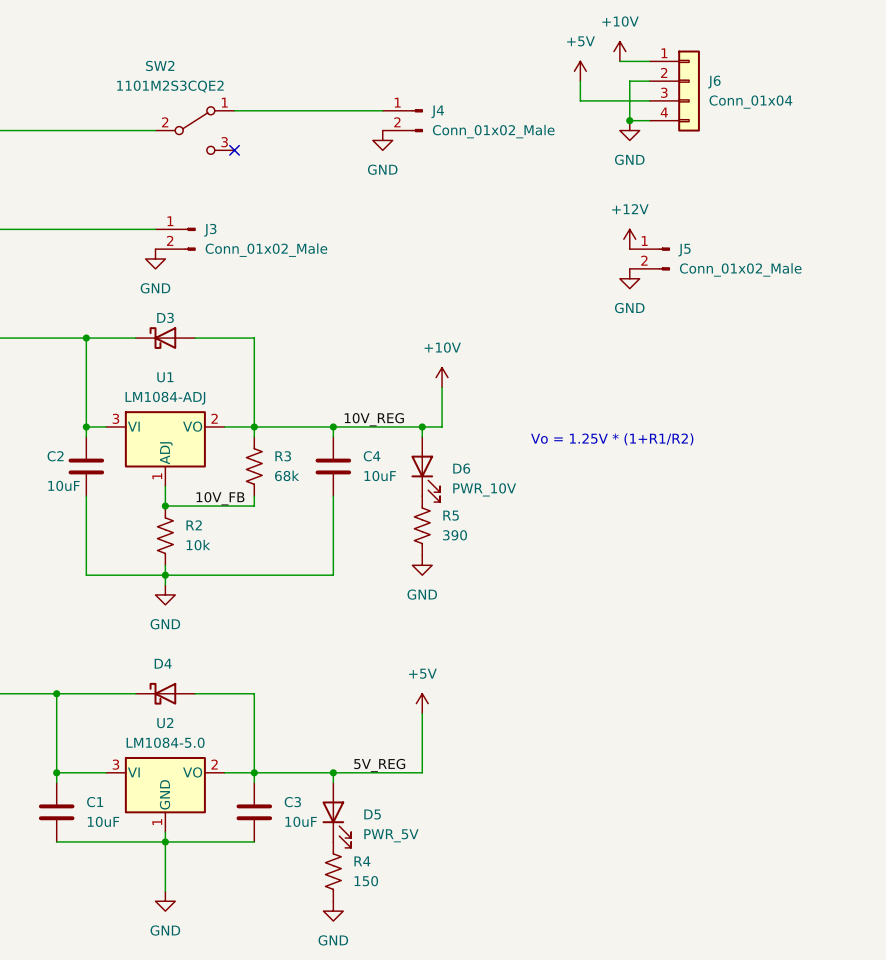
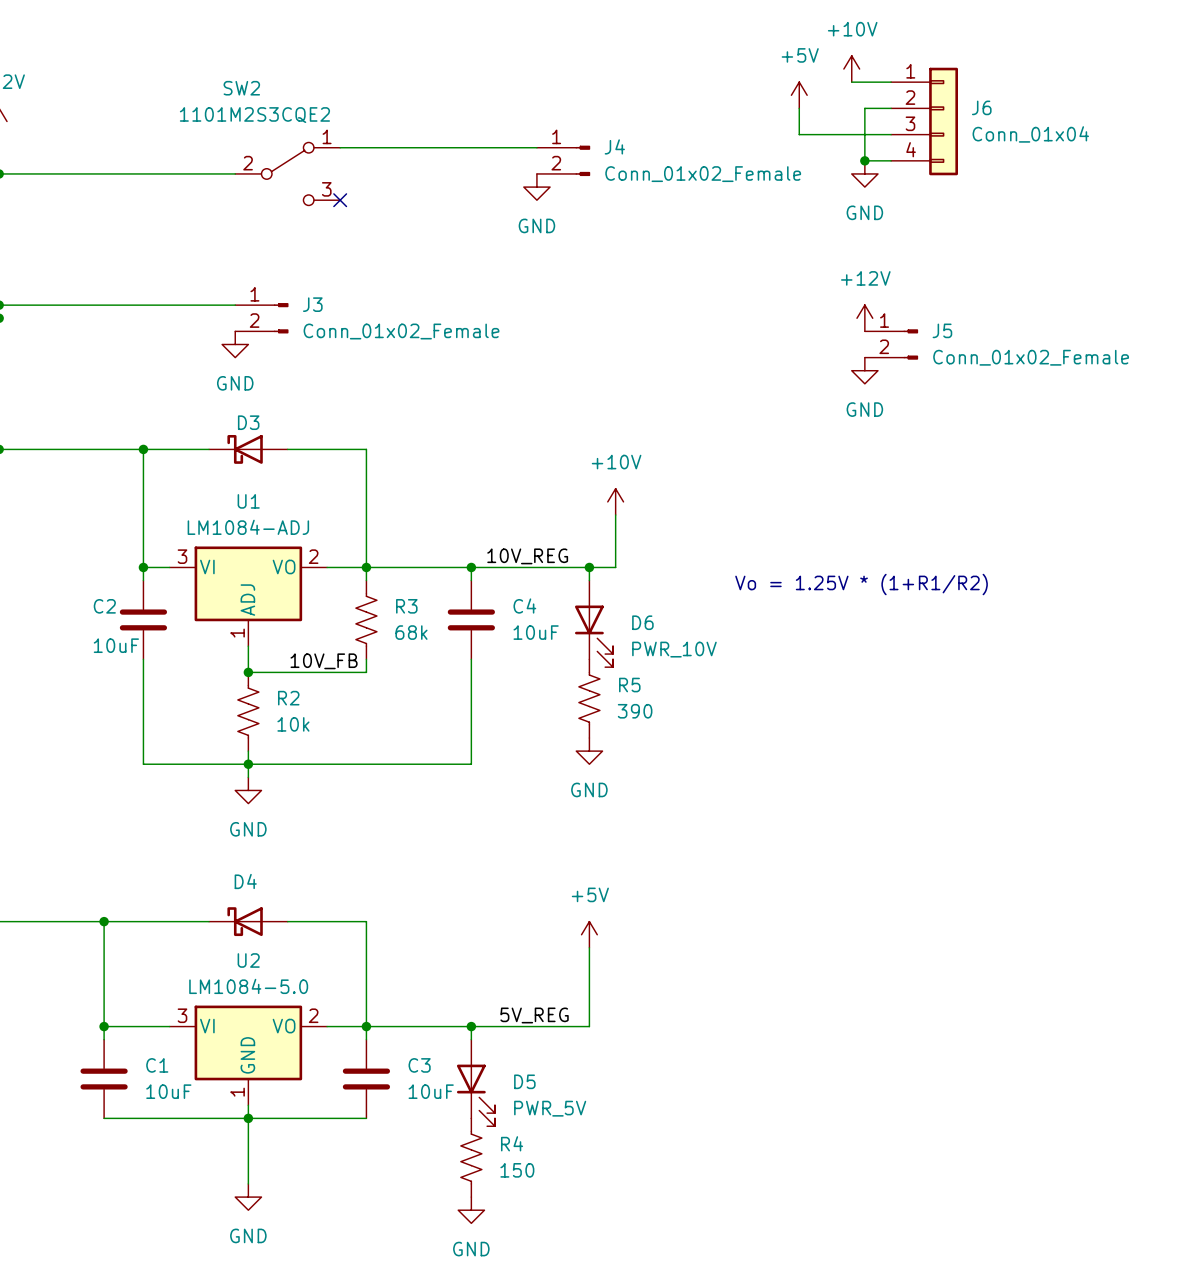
J4 value: Conn_01x02_Male (493, 131) -> Conn_01x02_Female (703, 174)
J3 value: Conn_01x02_Male (266, 250) -> Conn_01x02_Female (401, 331)
J5 value: Conn_01x02_Male (740, 269) -> Conn_01x02_Female (1031, 357)

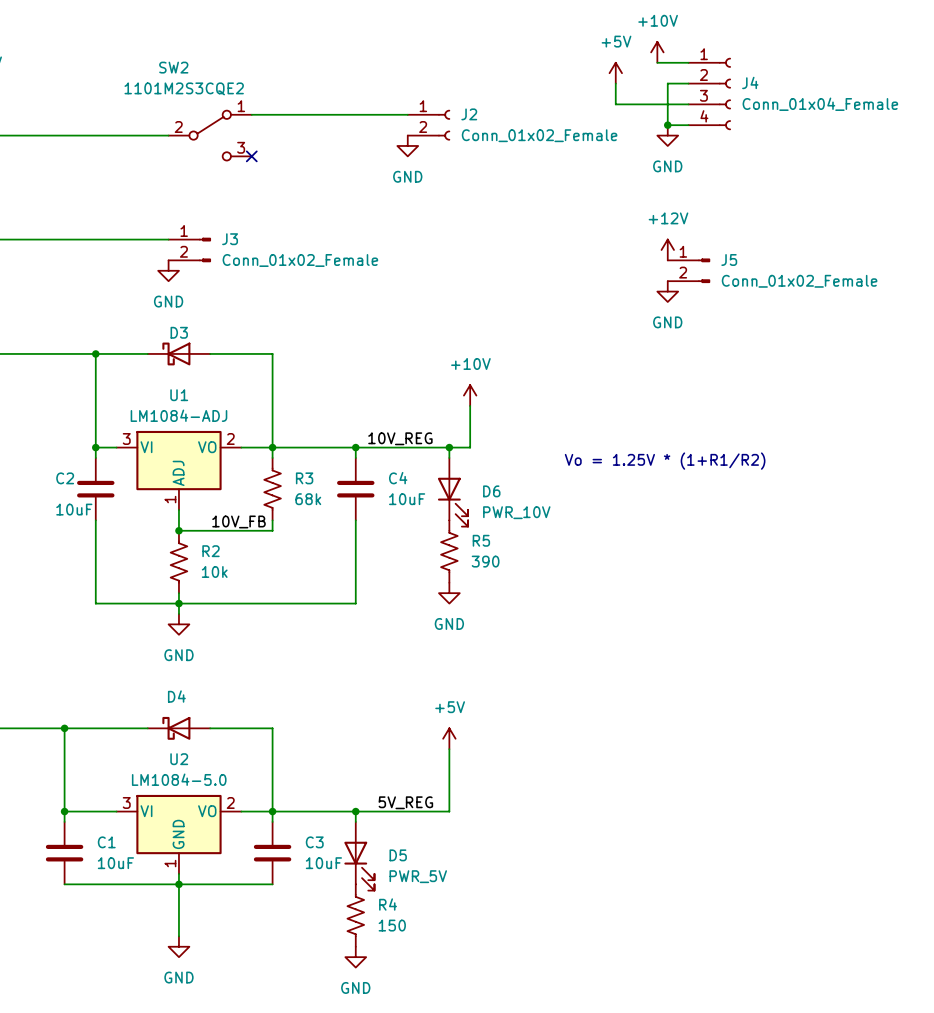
J6: Conn_01x04 (924, 121) -> none
J4 symbol: [536, 145, 591, 177] -> [688, 58, 731, 130]
J2: none -> Conn_01x02_Female (428, 125)
J4 value: Conn_01x02_Female (703, 174) -> Conn_01x04_Female (820, 104)

